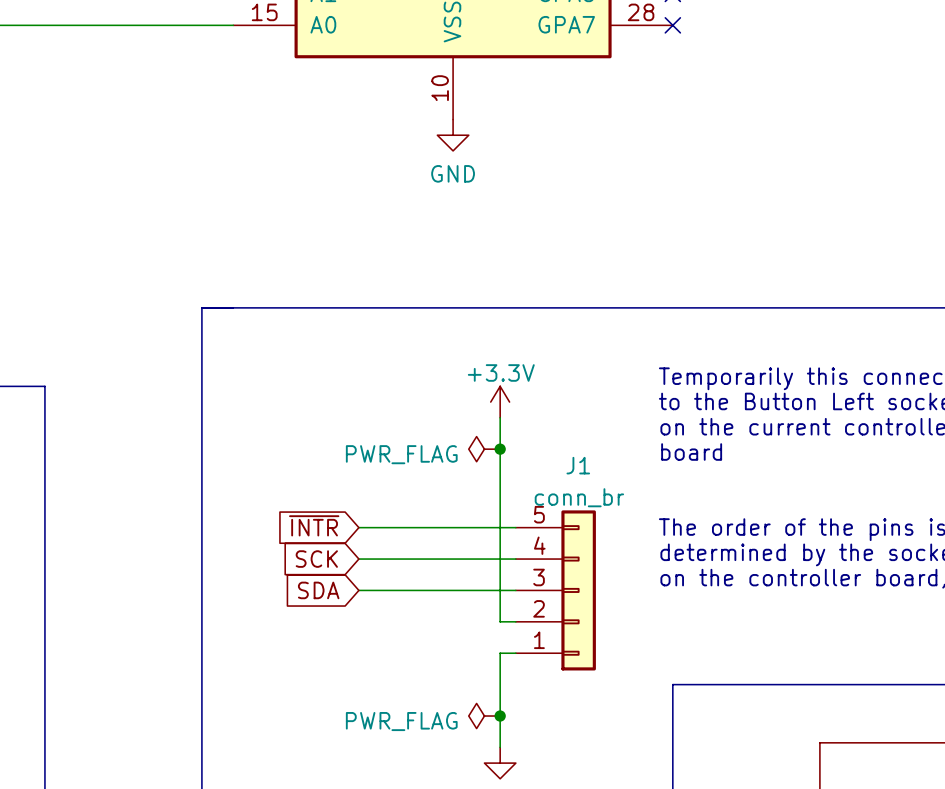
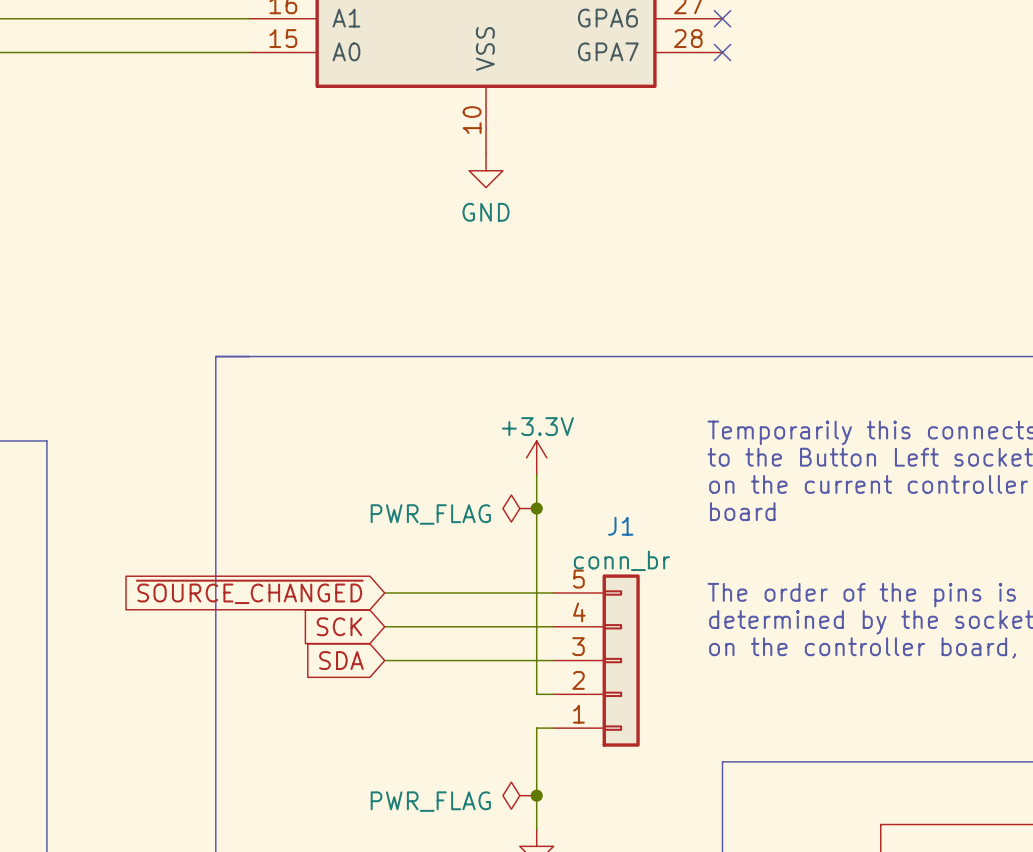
global label: ~{INTR} (314, 525) -> ~{SOURCE_CHANGED} (249, 591)

